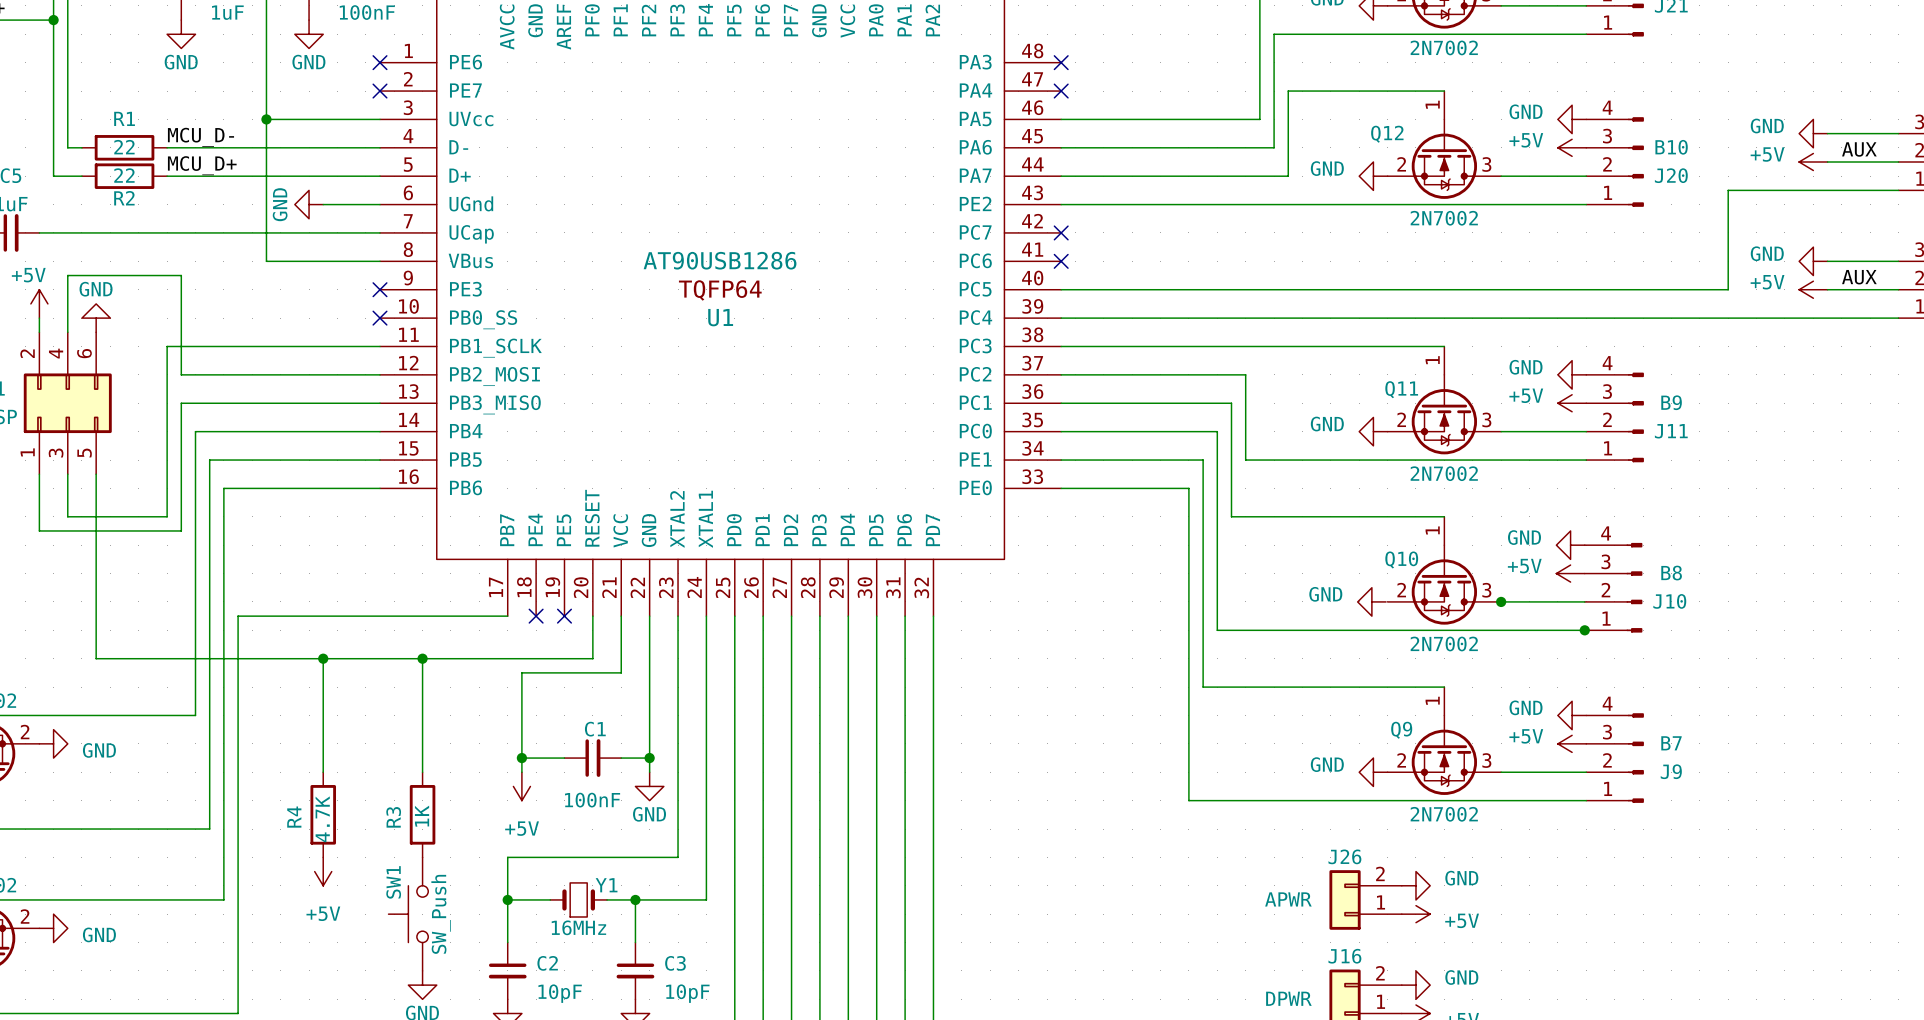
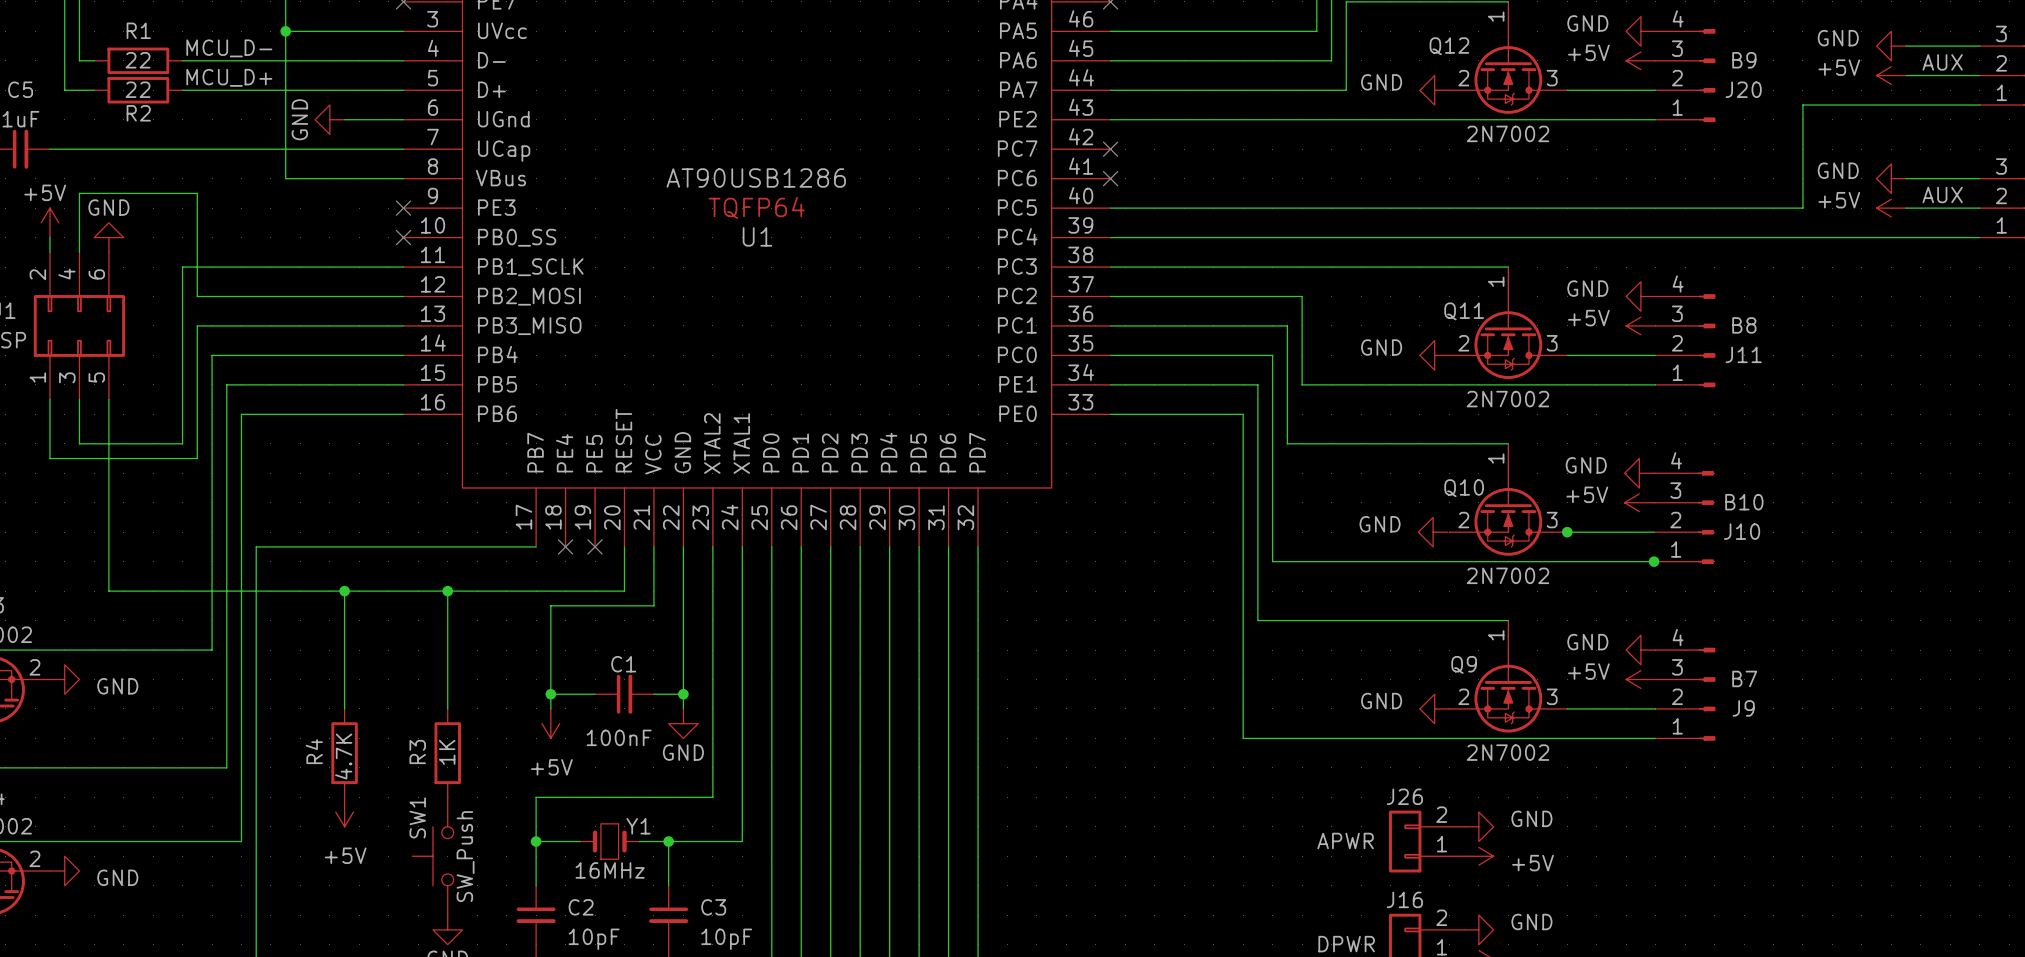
J20 value: B10 (1671, 147) -> B9 (1744, 60)
J11 value: B9 (1671, 402) -> B8 (1744, 325)
J10 value: B8 (1671, 573) -> B10 (1744, 502)

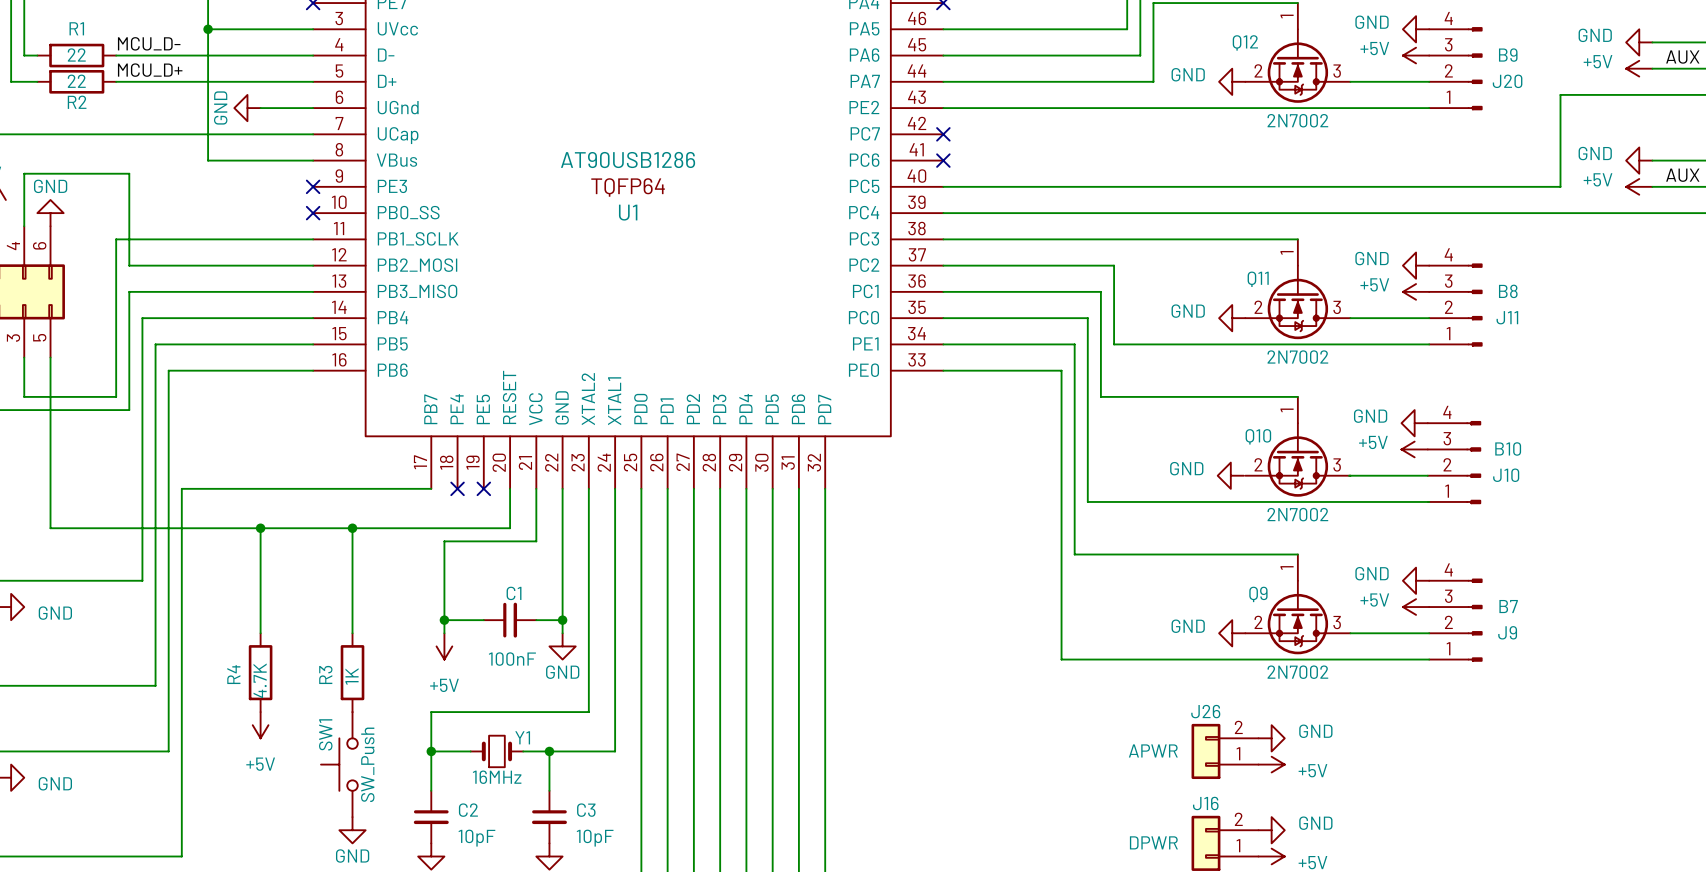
junction: (1567, 532) -> none
junction: (1654, 561) -> none

